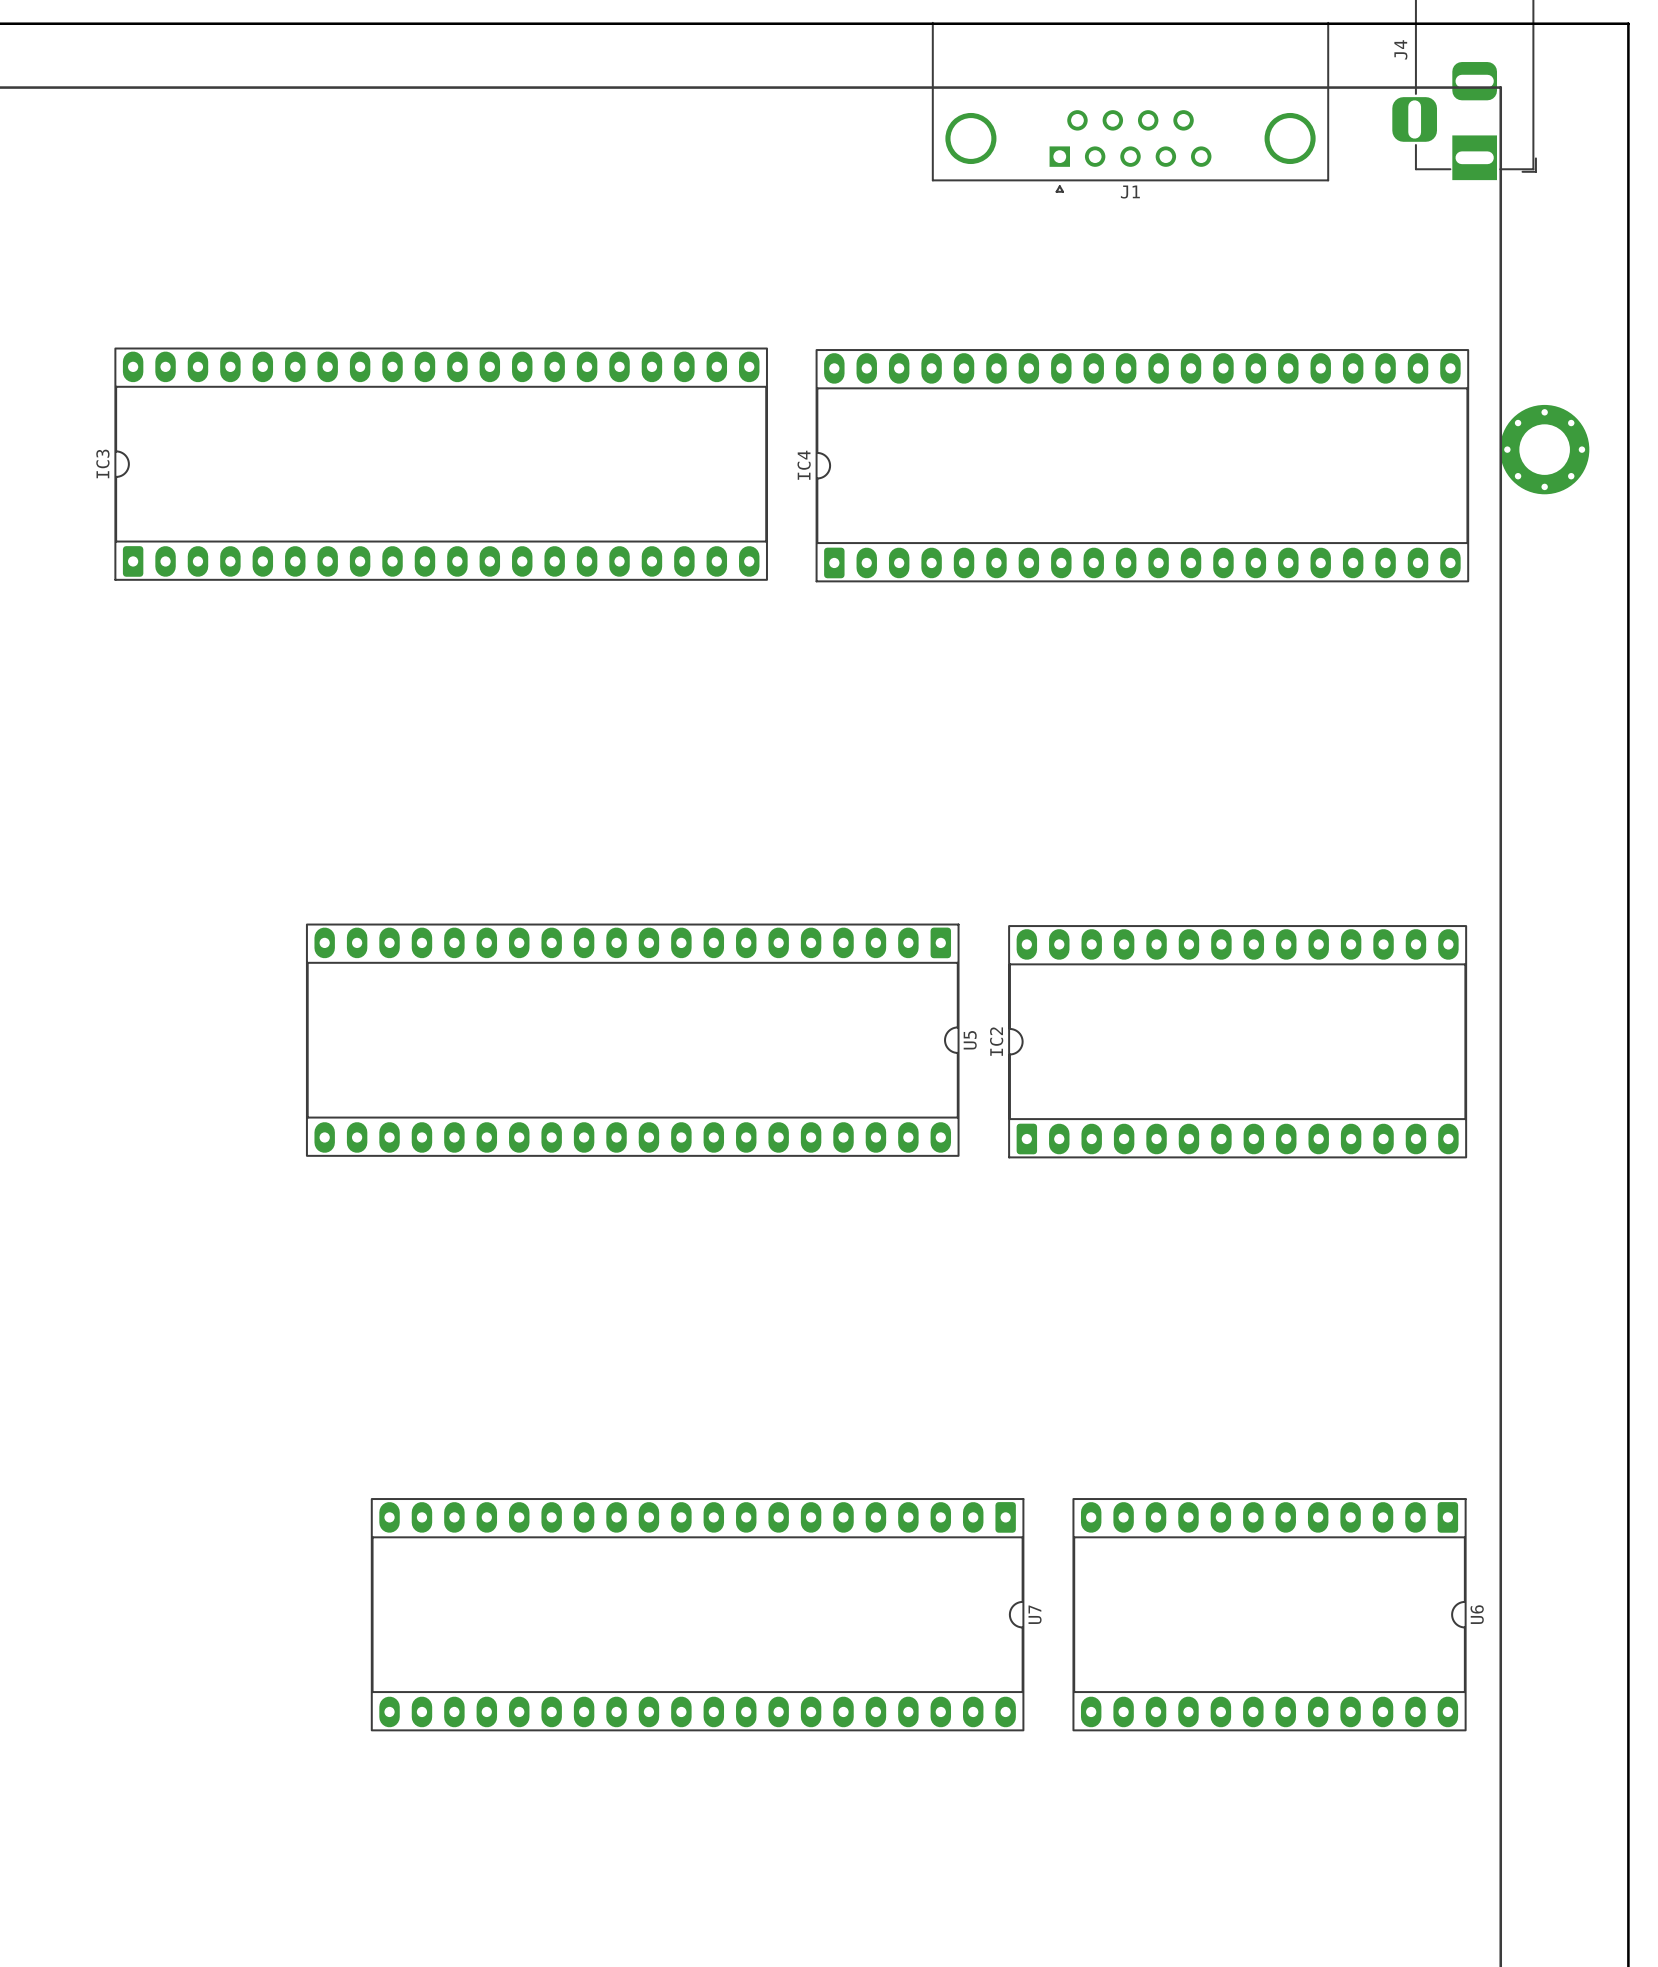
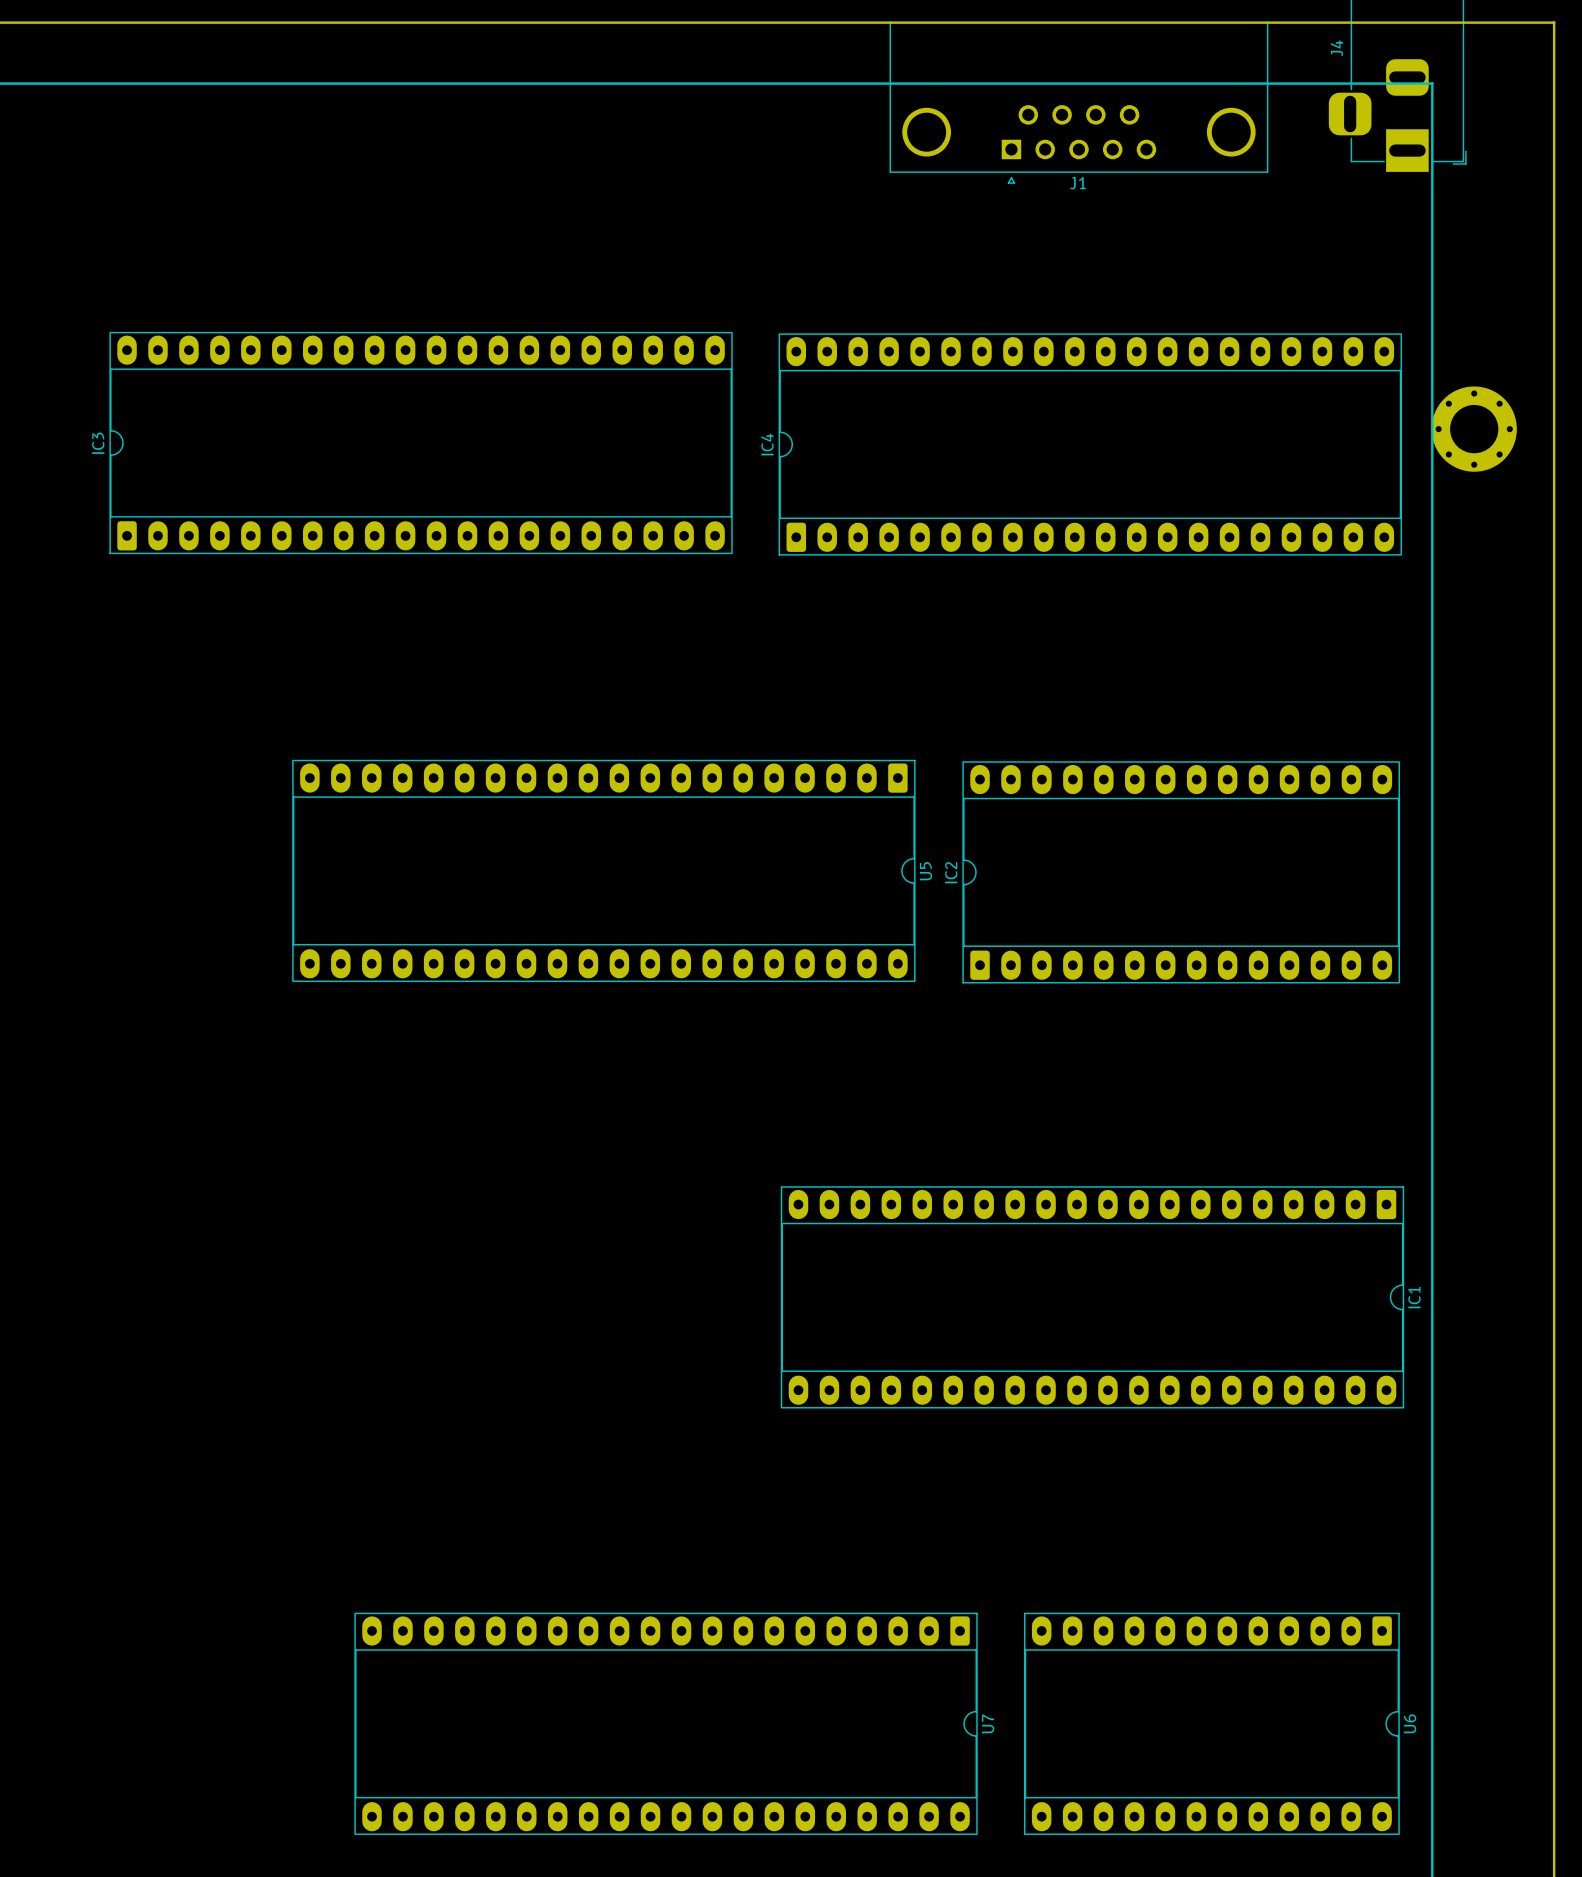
U5 position: (632, 1040) -> (603, 870)
IC2 position: (1237, 1041) -> (1181, 872)
IC1: none -> (1092, 1297)
U7 position: (697, 1614) -> (666, 1723)
U6 position: (1269, 1614) -> (1211, 1723)

